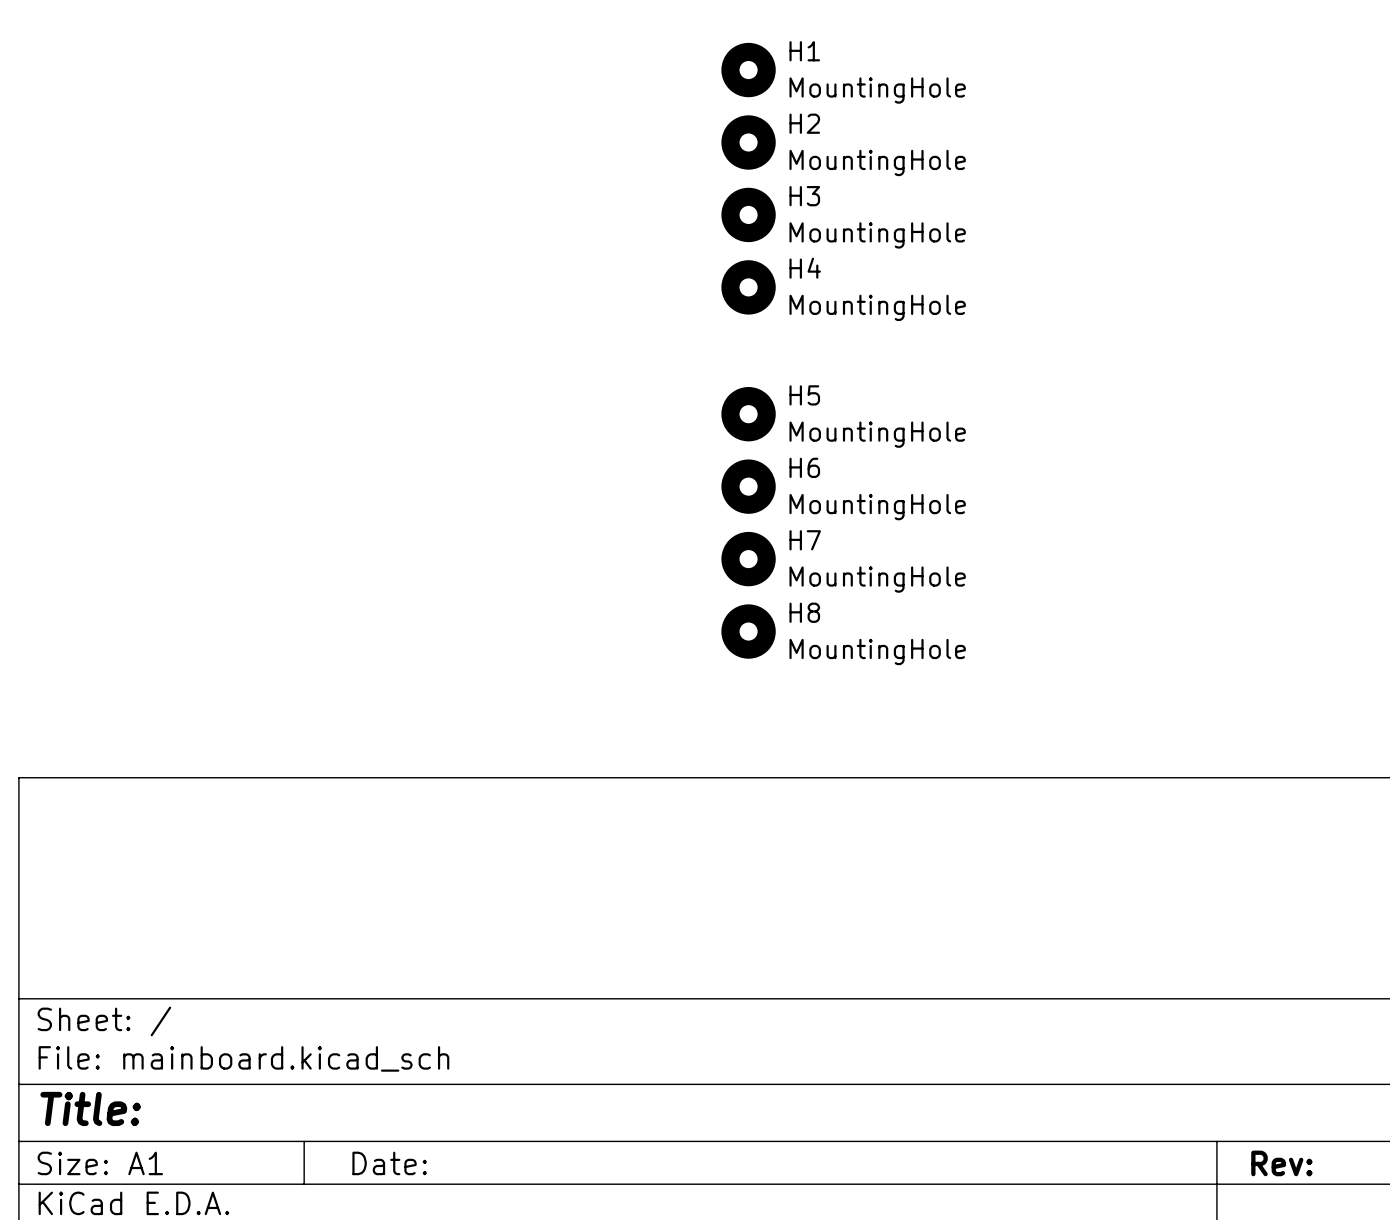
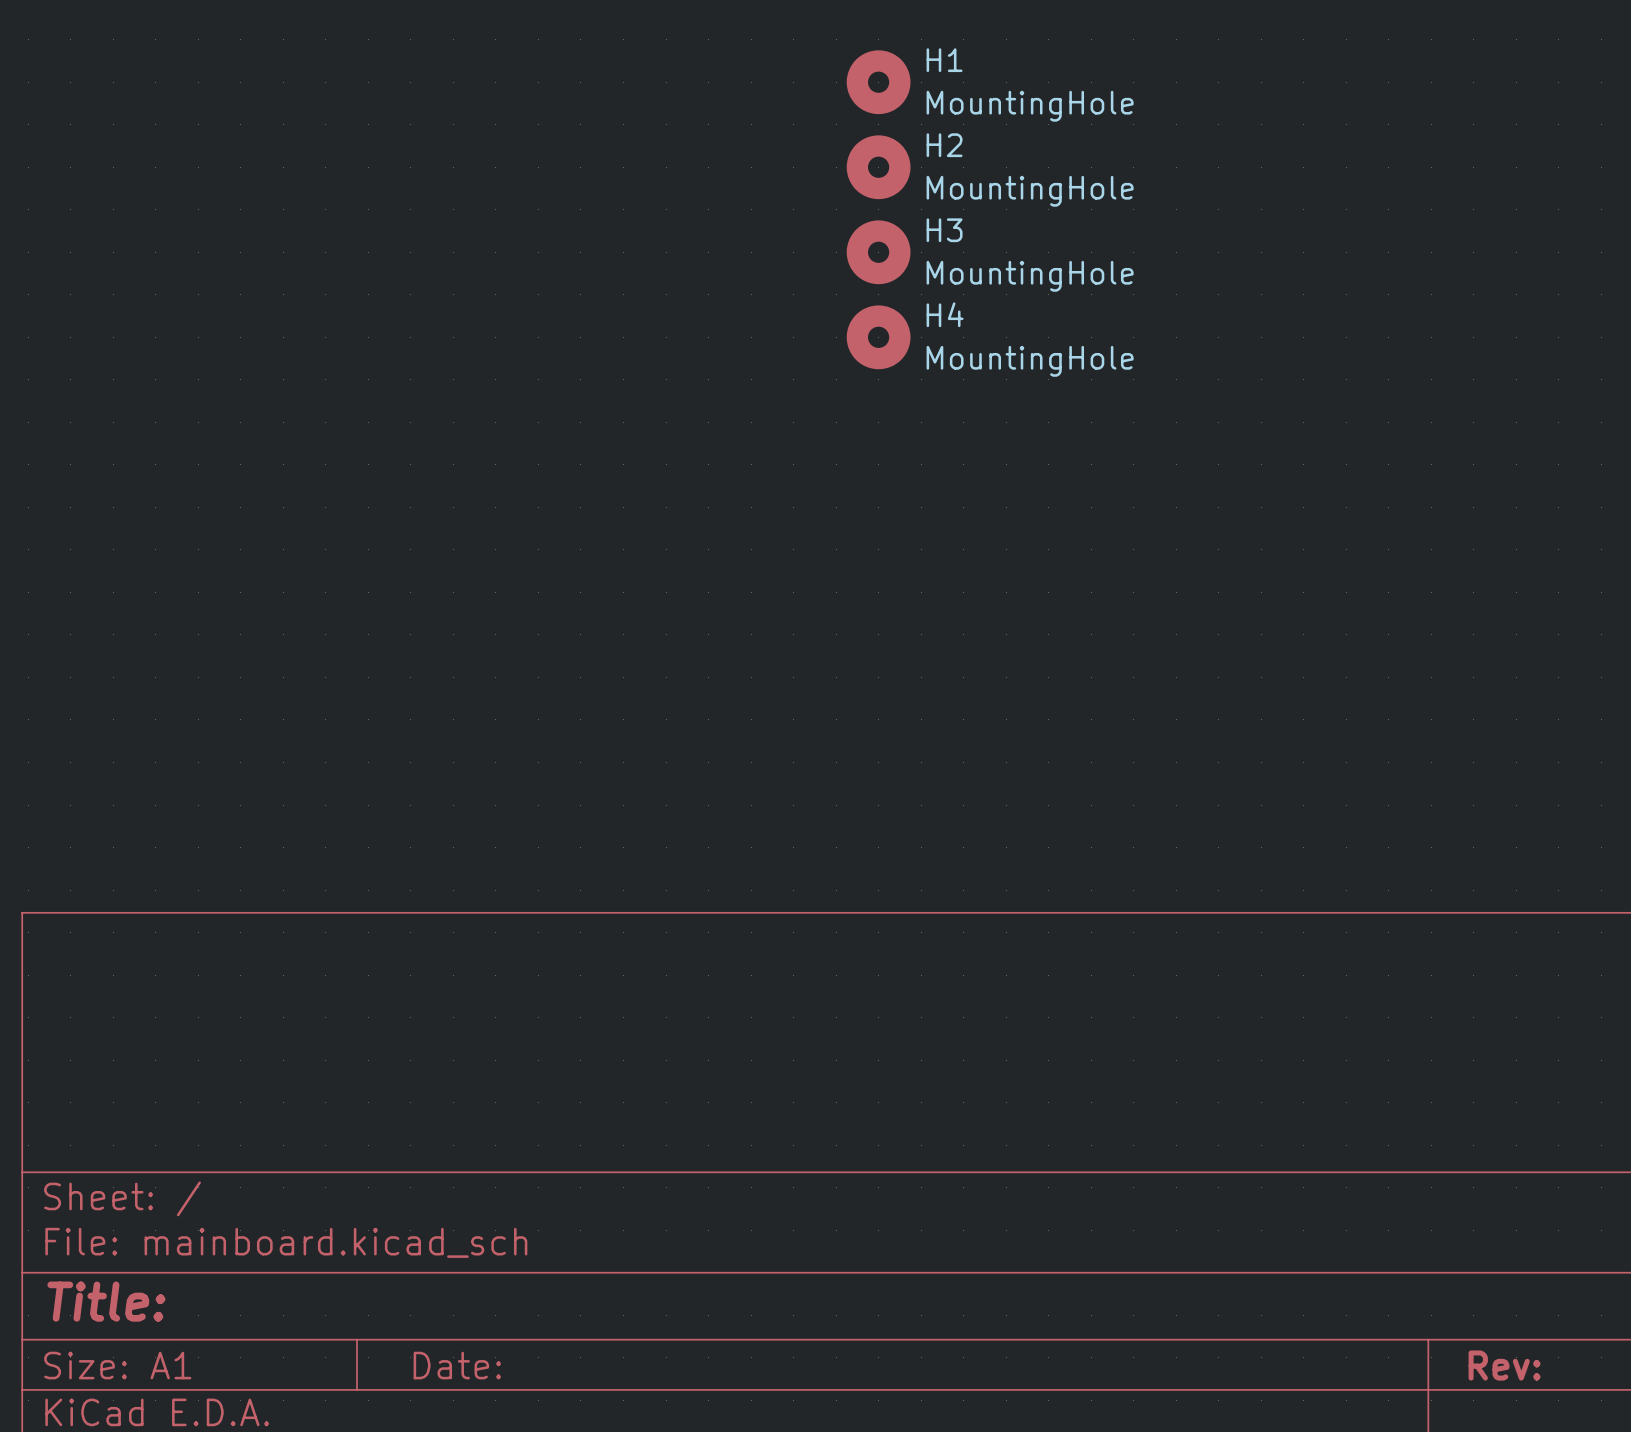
H5: MountingHole (748, 414) -> none
H6: MountingHole (748, 486) -> none
H7: MountingHole (748, 559) -> none
H8: MountingHole (748, 631) -> none

